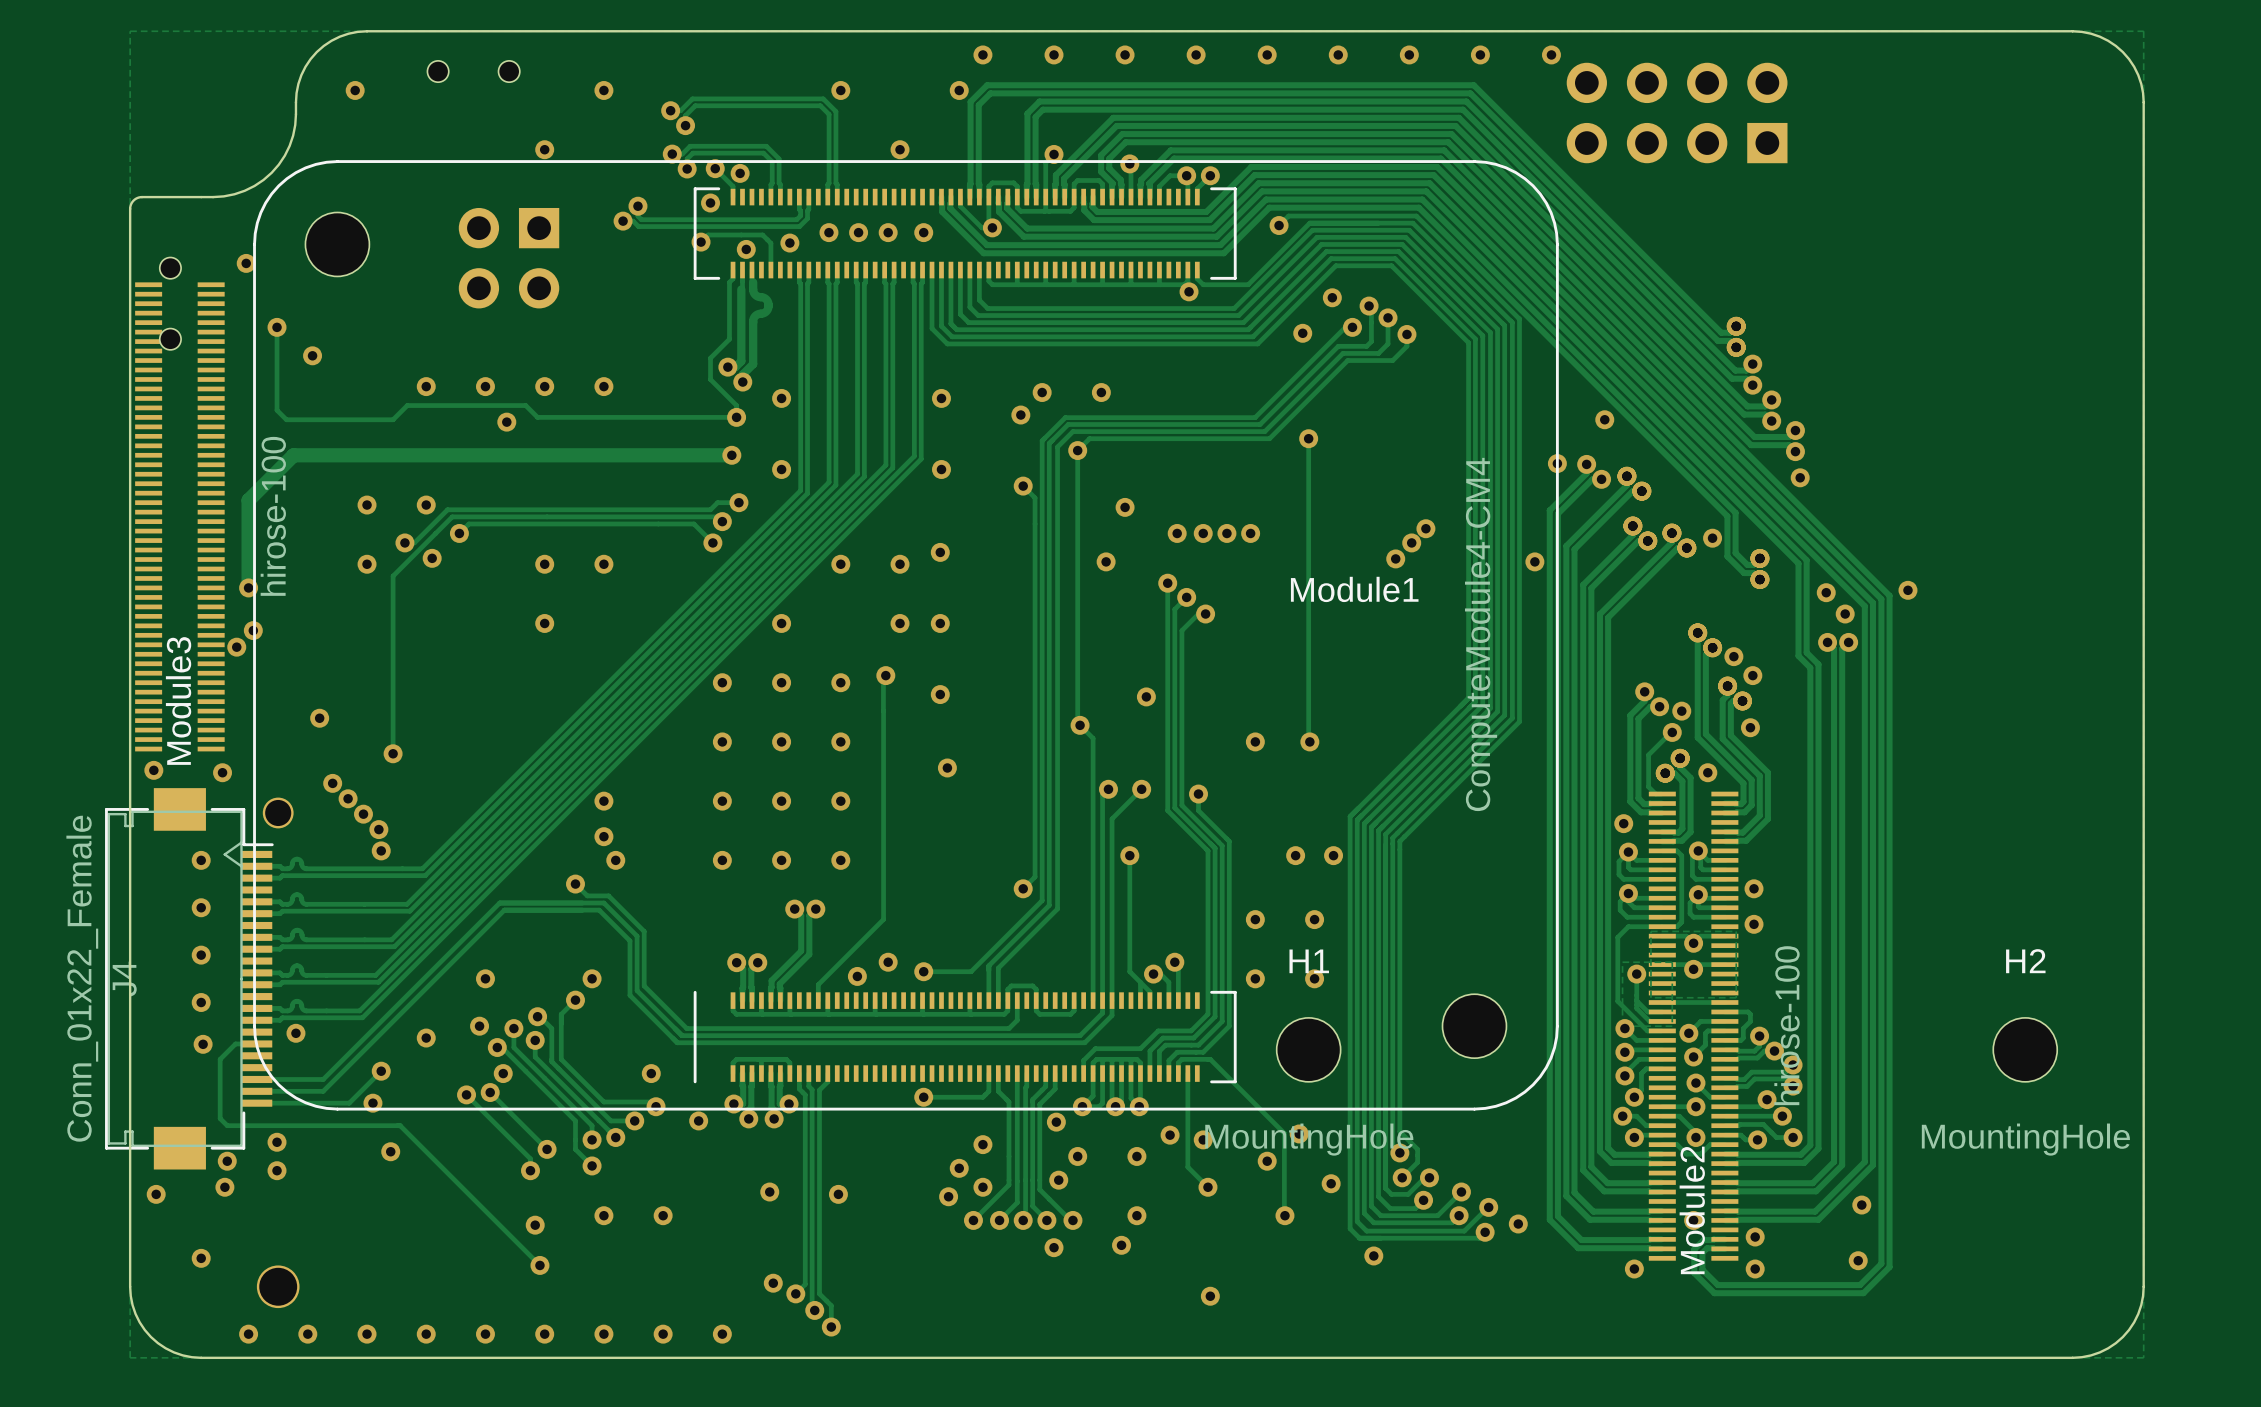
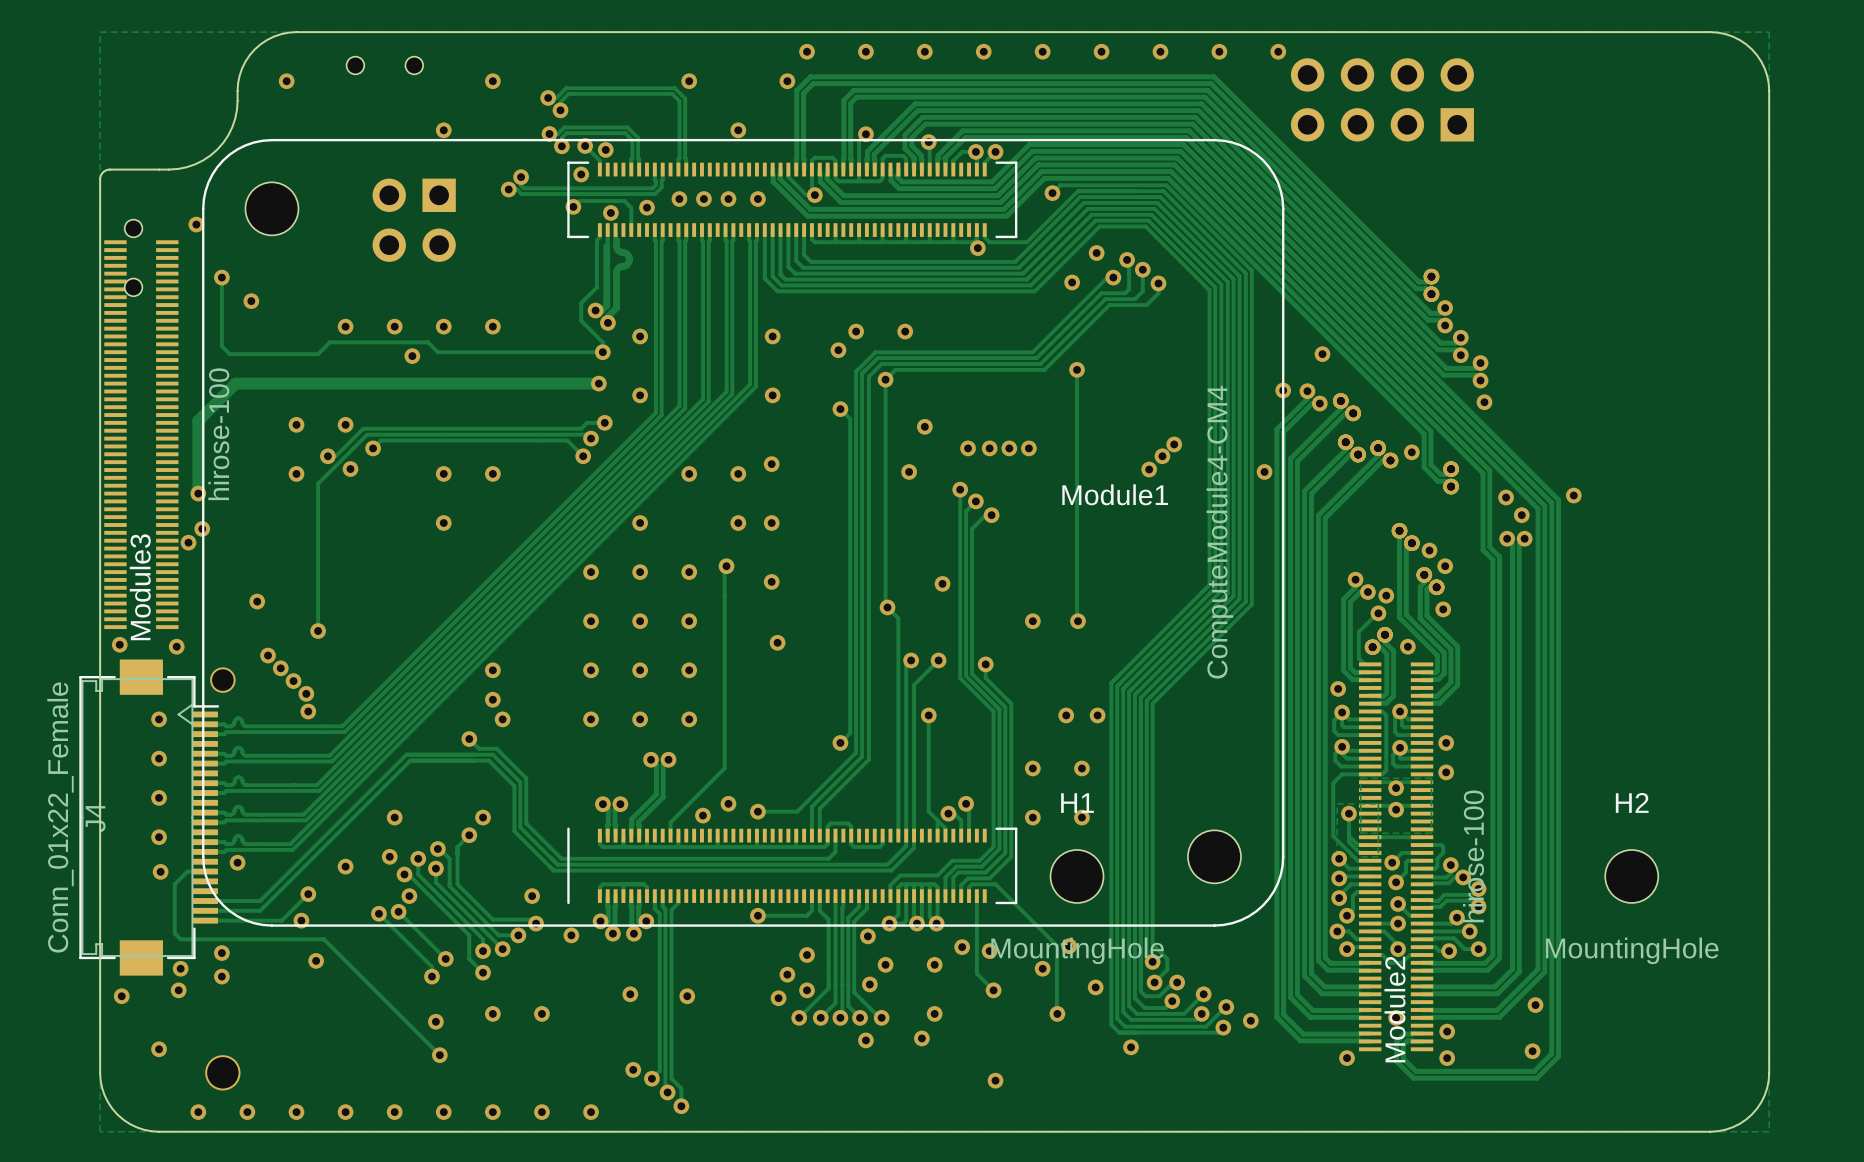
H2 position: (2025, 1049) -> (1631, 876)

